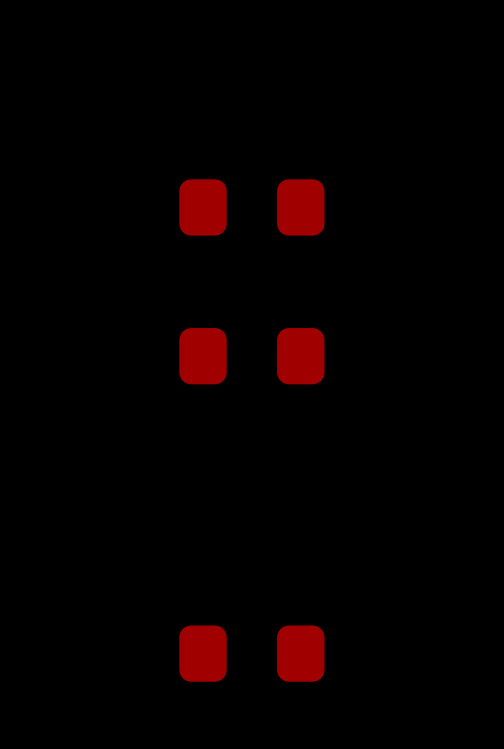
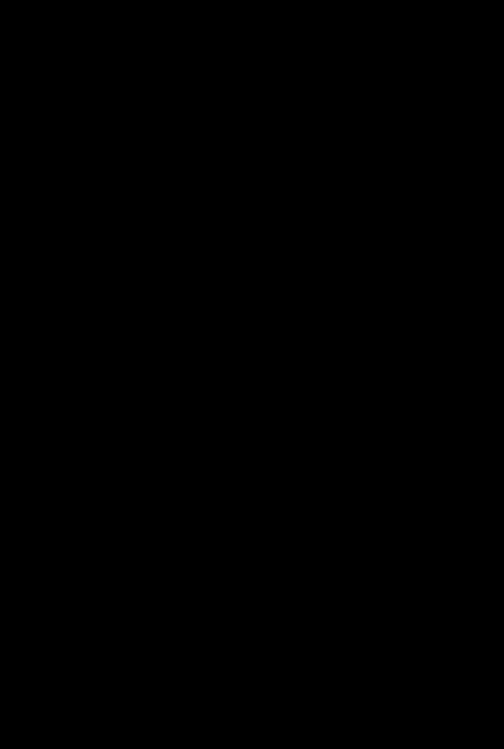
part: (251, 207) -> none
part: (251, 356) -> none
part: (251, 653) -> none

